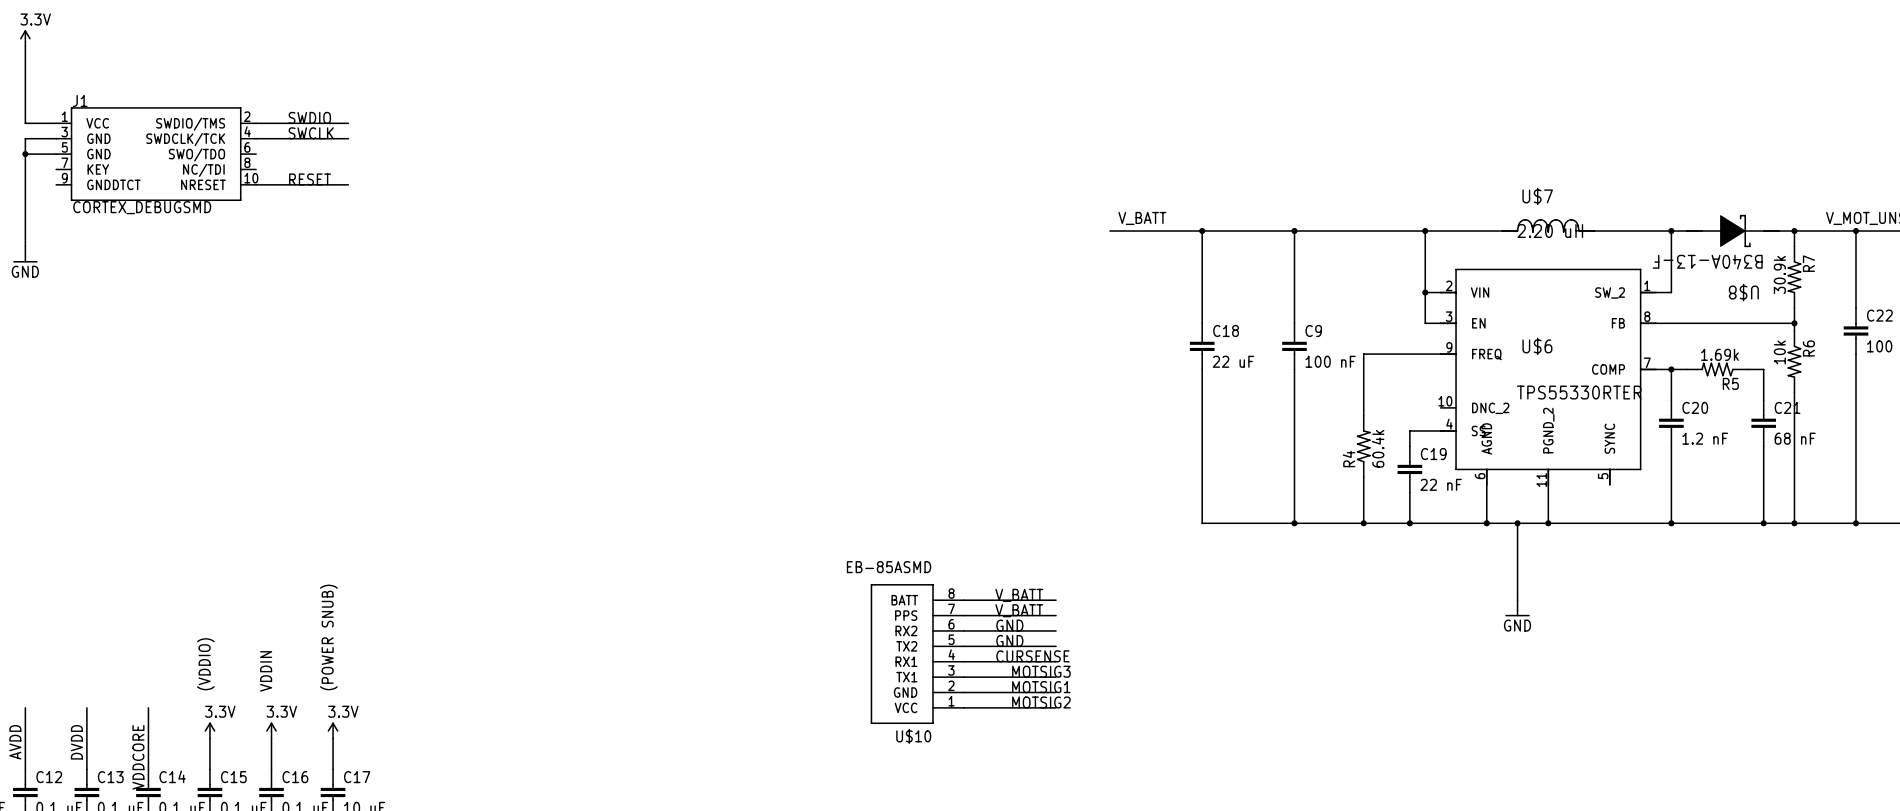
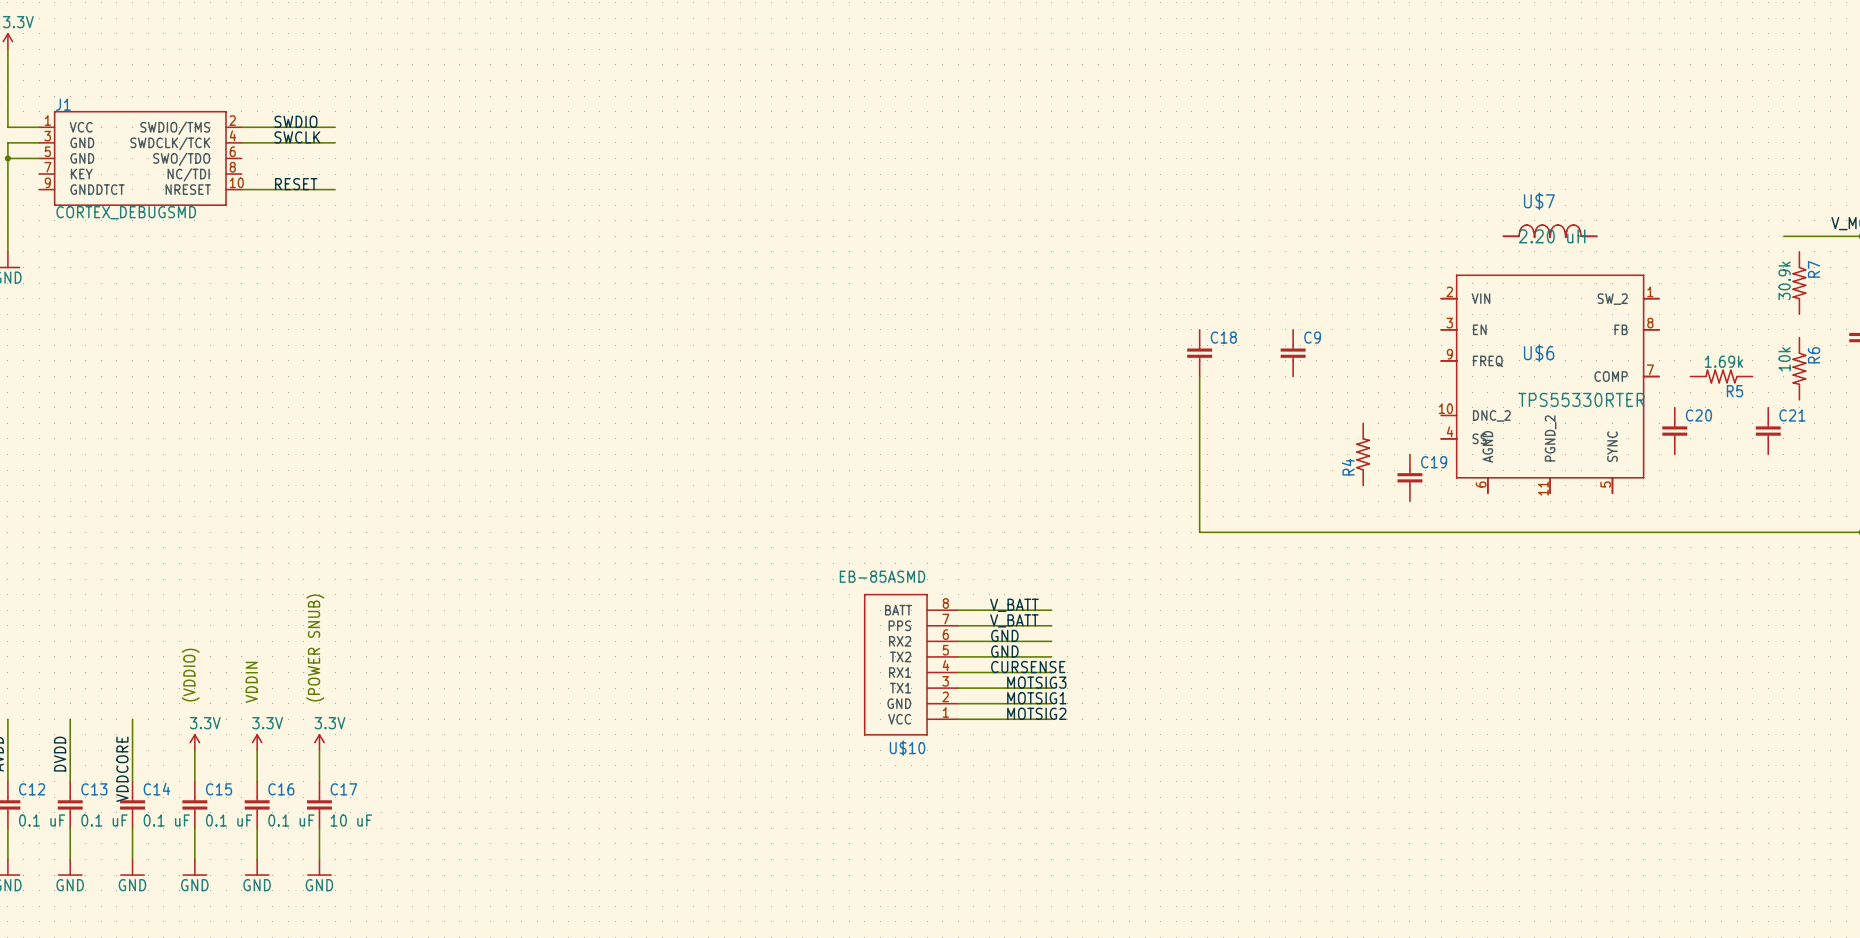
label: V_BATT (1142, 218) -> none
wire: (1109, 231) (1502, 231) -> none
wire: (1202, 231) (1202, 323) -> none
junction: (1202, 231) -> none
wire: (1294, 231) (1294, 323) -> none
junction: (1294, 231) -> none
wire: (1425, 231) (1425, 323) (1440, 323) -> none
junction: (1425, 231) -> none
wire: (1594, 231) (1686, 231) -> none
wire: (1671, 231) (1671, 292) (1656, 292) -> none
junction: (1671, 231) -> none
U$8: B340A-13-F (1732, 231) -> none
wire: (1794, 231) (1794, 246) -> none
junction: (1794, 231) -> none
wire: (1425, 292) (1440, 292) -> none
junction: (1425, 292) -> none
wire: (1794, 307) (1794, 331) -> none
wire: (1656, 323) (1794, 323) -> none
junction: (1794, 323) -> none
wire: (1440, 354) (1363, 354) (1363, 415) -> none
C18 value: 22 uF (1233, 361) -> none
C9 value: 100 nF (1330, 361) -> none
wire: (1294, 369) (1294, 523) -> none
wire: (1656, 369) (1686, 369) -> none
wire: (1671, 369) (1671, 400) -> none
junction: (1671, 369) -> none
wire: (1748, 369) (1763, 369) (1763, 400) -> none
wire: (1794, 392) (1794, 523) -> none
wire: (1440, 430) (1409, 430) (1409, 446) -> none
C20 value: 1.2 nF (1705, 438) -> none
C21 value: 68 nF (1795, 438) -> none
wire: (1671, 446) (1671, 523) -> none
wire: (1763, 446) (1763, 523) -> none
R4 value: 60.4k (1378, 448) -> none
wire: (1363, 477) (1363, 523) -> none
C19 value: 22 nF (1441, 484) -> none
wire: (1486, 484) (1486, 523) -> none
wire: (1548, 484) (1548, 523) -> none
wire: (1409, 492) (1409, 523) -> none
junction: (1294, 523) -> none
junction: (1363, 523) -> none
junction: (1409, 523) -> none
junction: (1486, 523) -> none
wire: (1517, 523) (1517, 600) -> none
junction: (1517, 523) -> none
junction: (1548, 523) -> none
junction: (1671, 523) -> none
junction: (1763, 523) -> none
junction: (1794, 523) -> none
power symbol: GND (1517, 608) -> none

